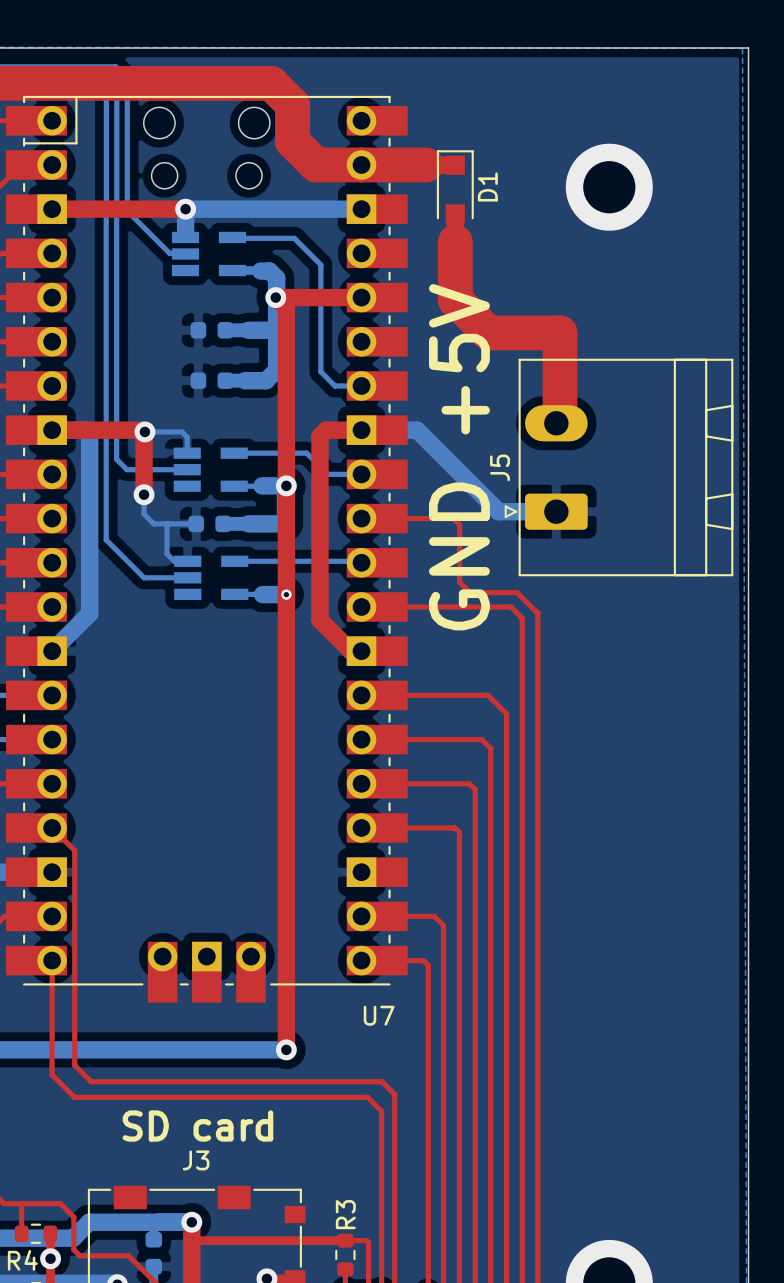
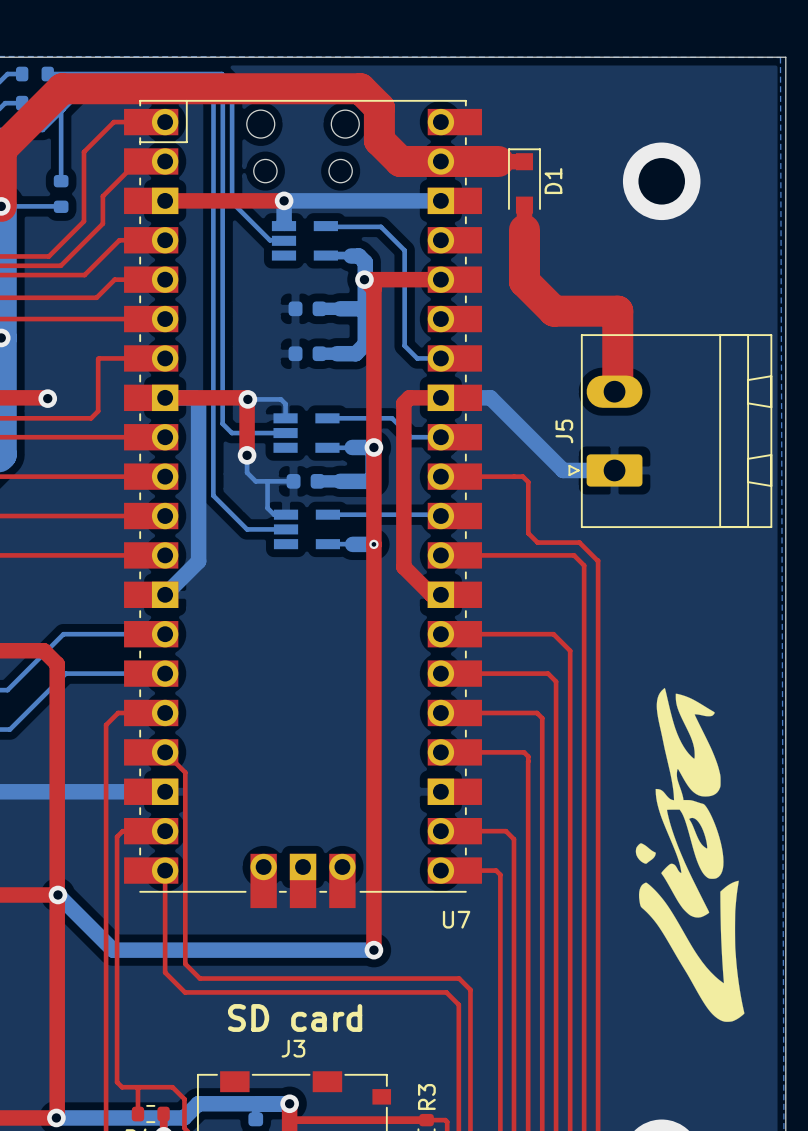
text: +5V (459, 359) -> none
text: GND (459, 556) -> none
drawing: none -> [635, 687, 745, 1022]

